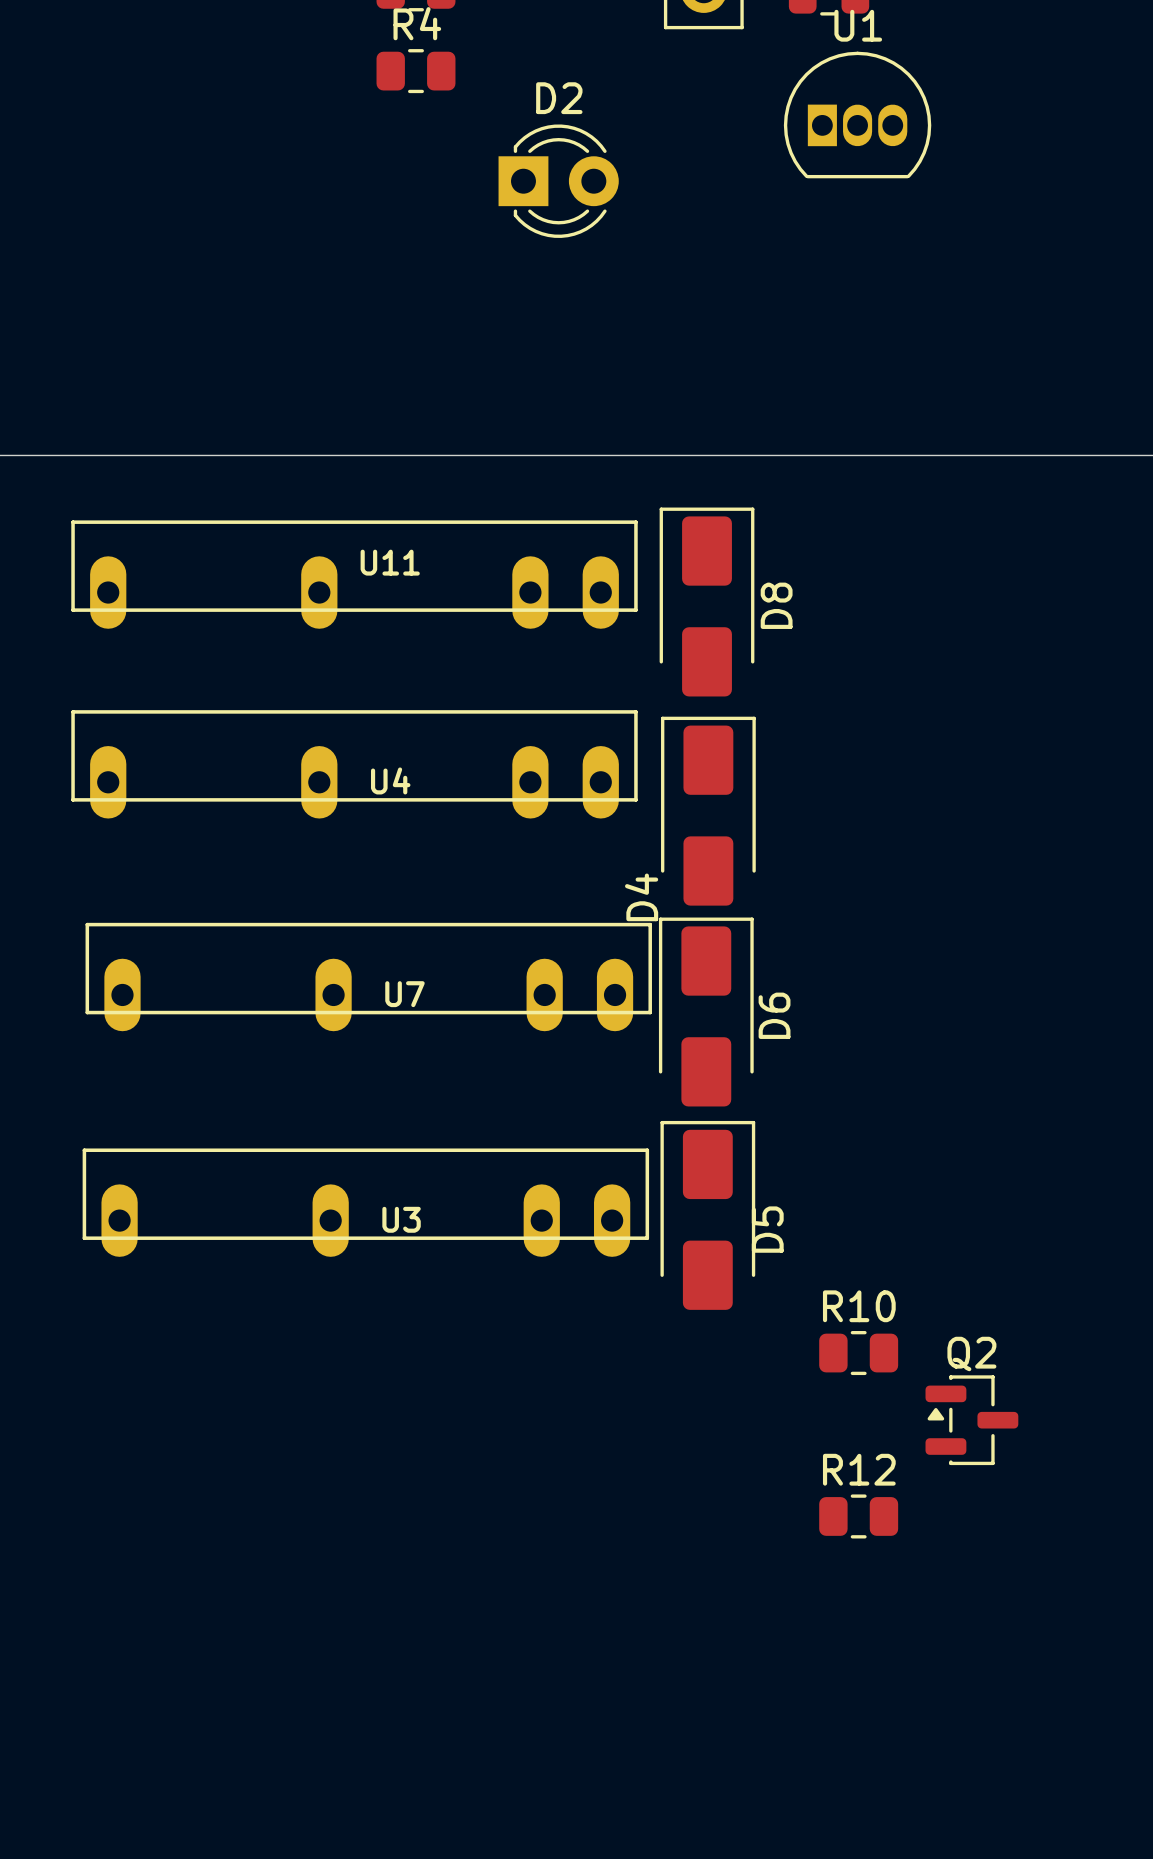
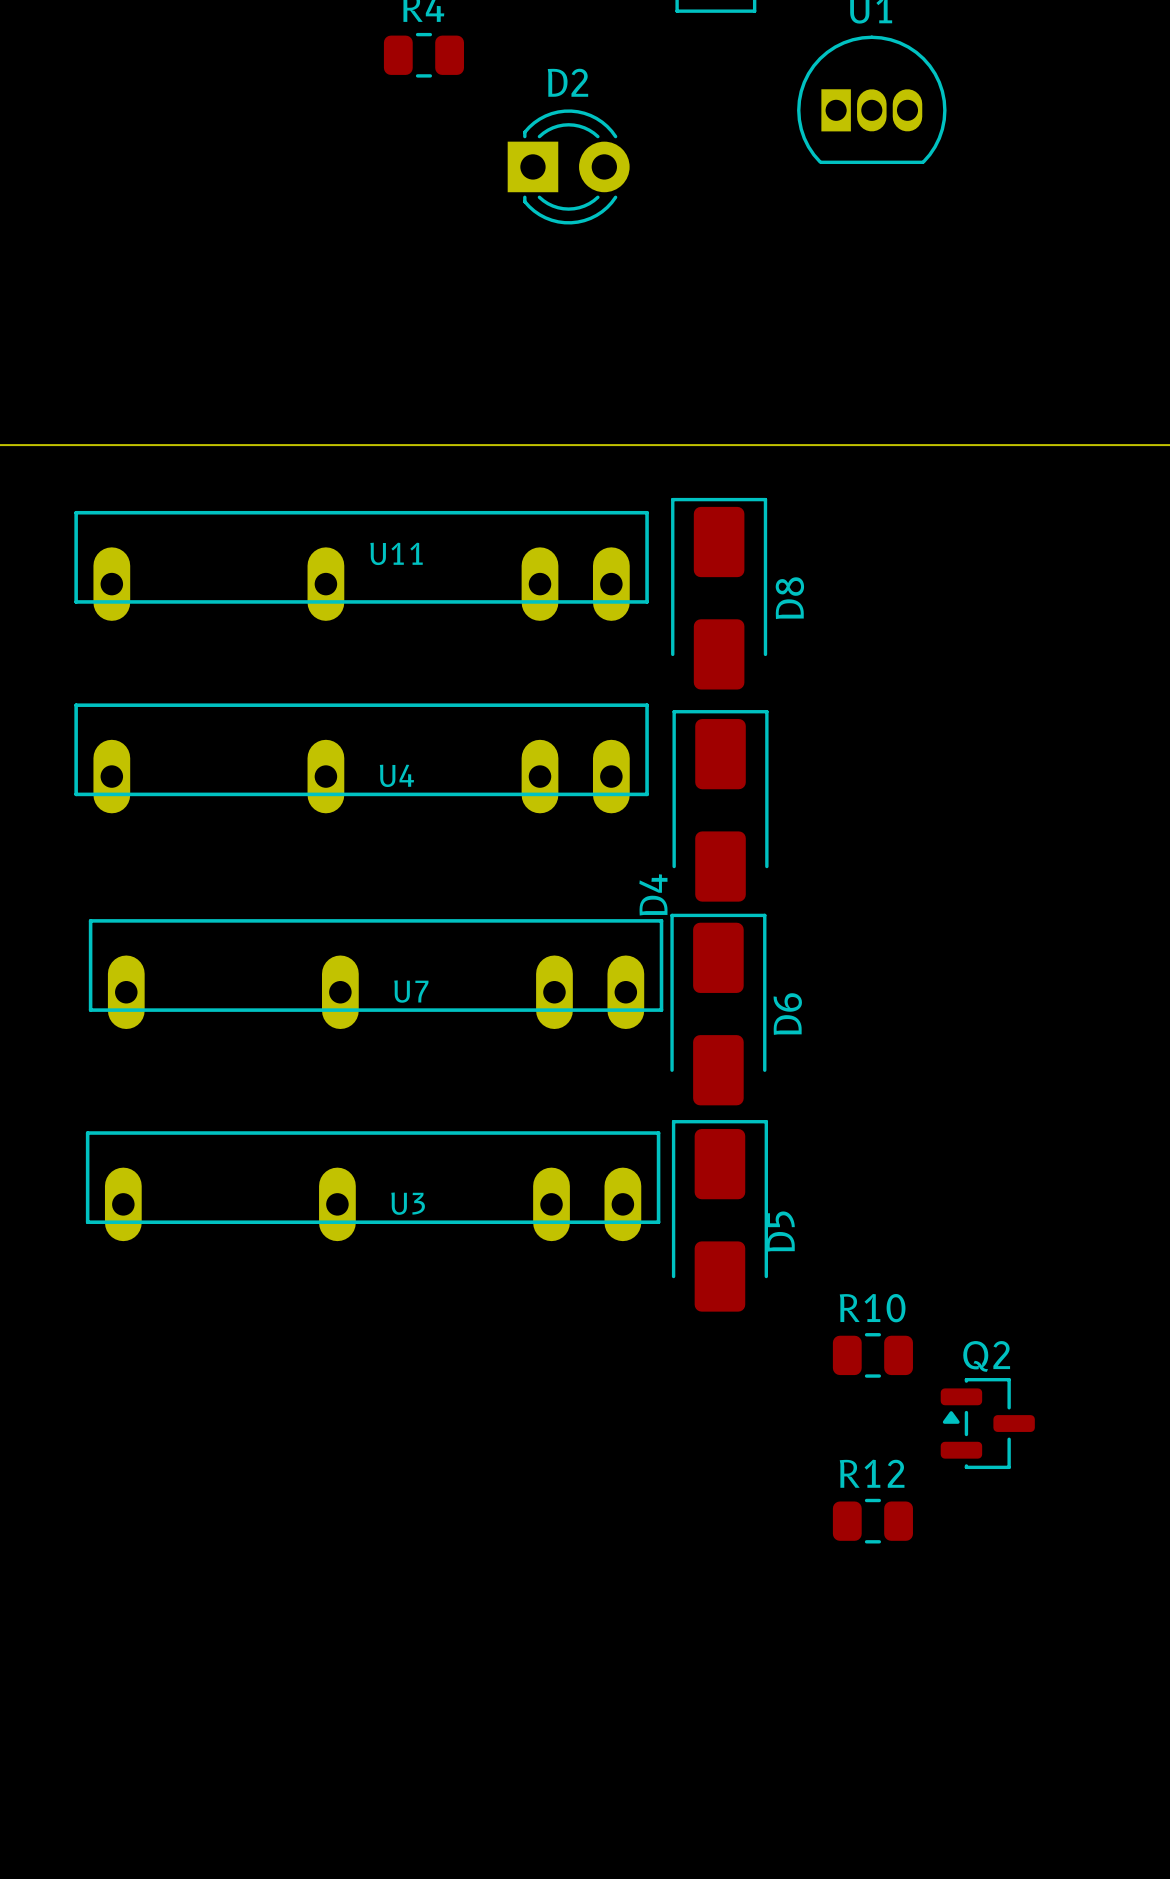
U3 position: (365, 1202) -> (373, 1186)

